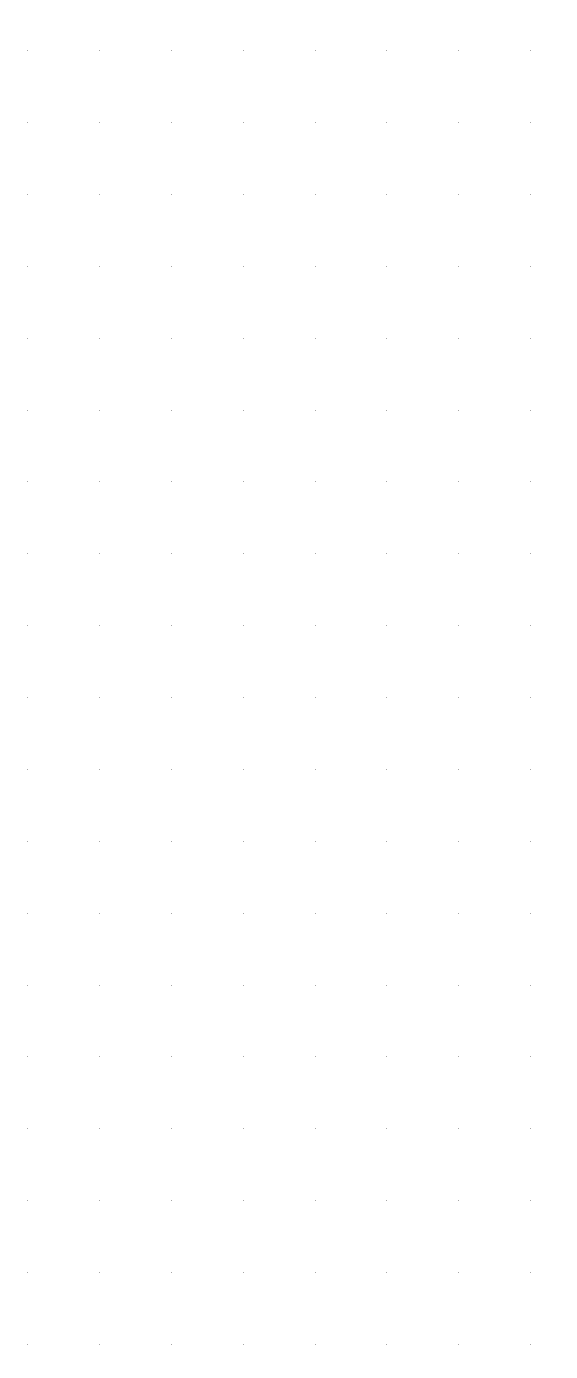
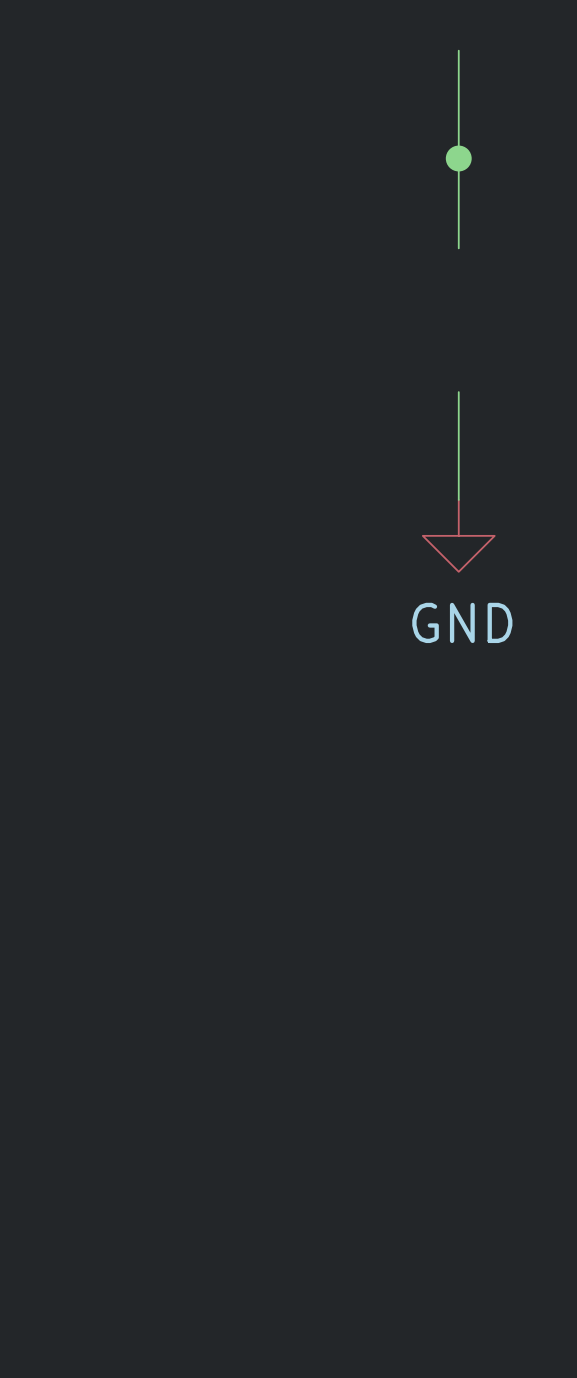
wire: none -> (458, 50) (458, 248)
junction: none -> (458, 158)
wire: none -> (458, 392) (458, 499)
power symbol: none -> GND (458, 535)

